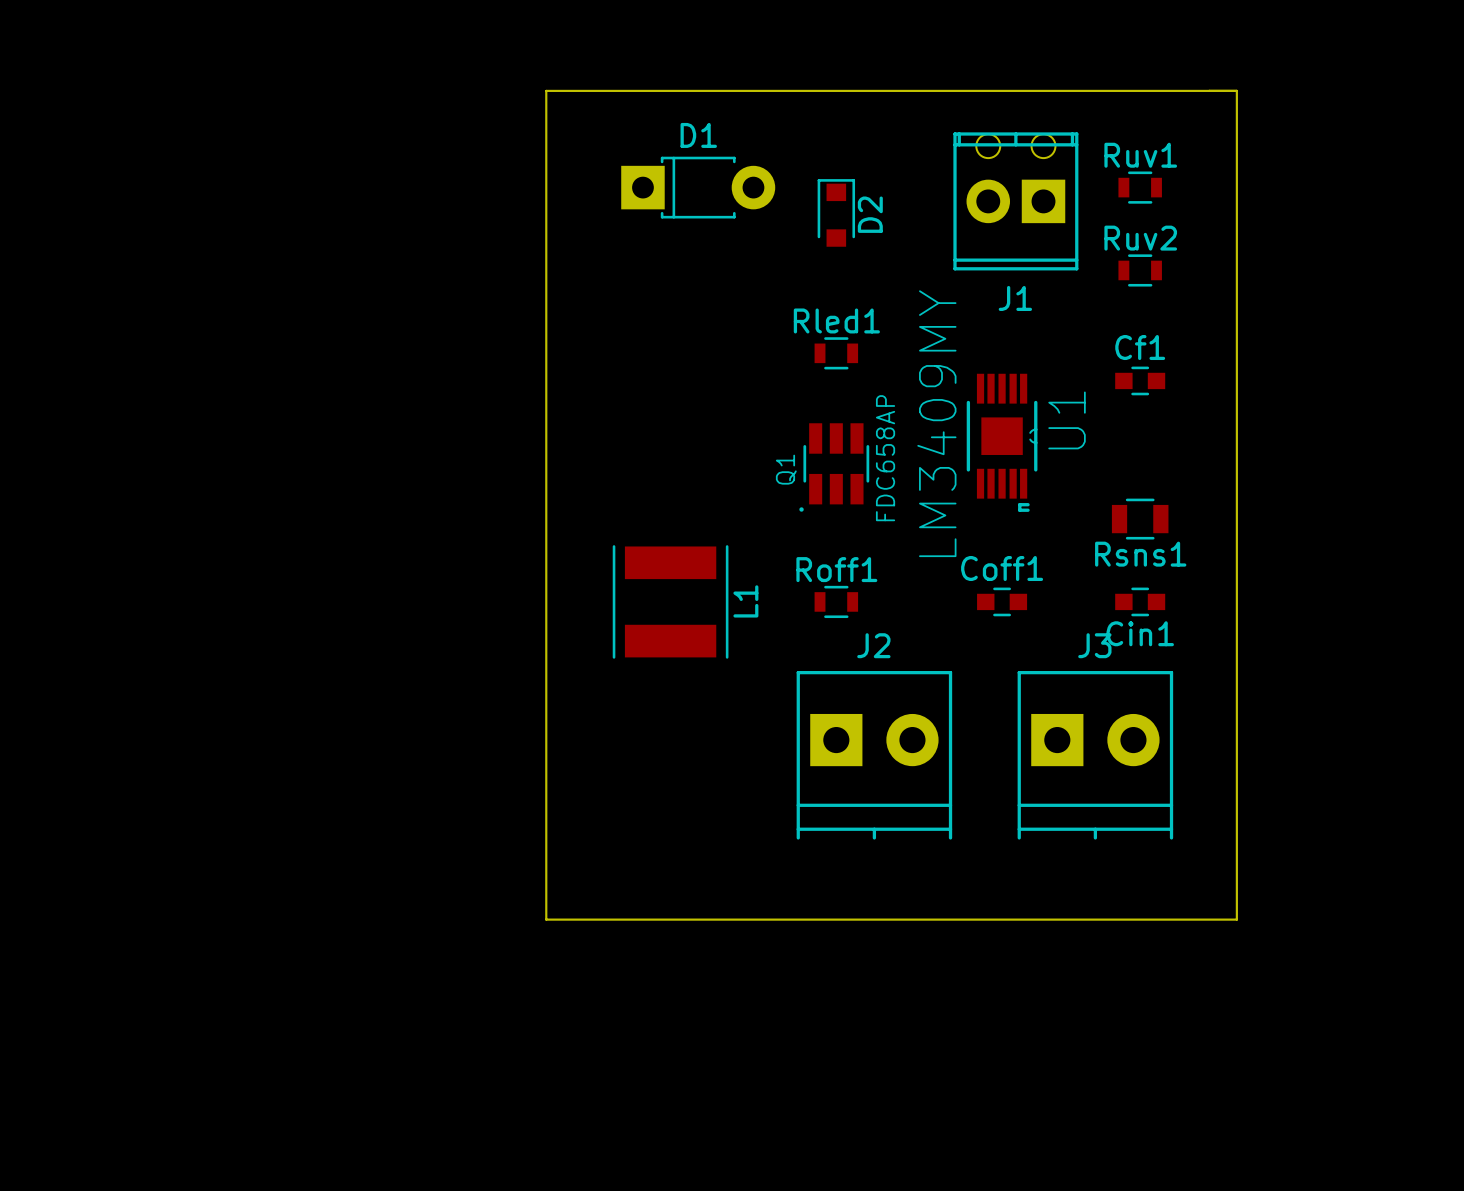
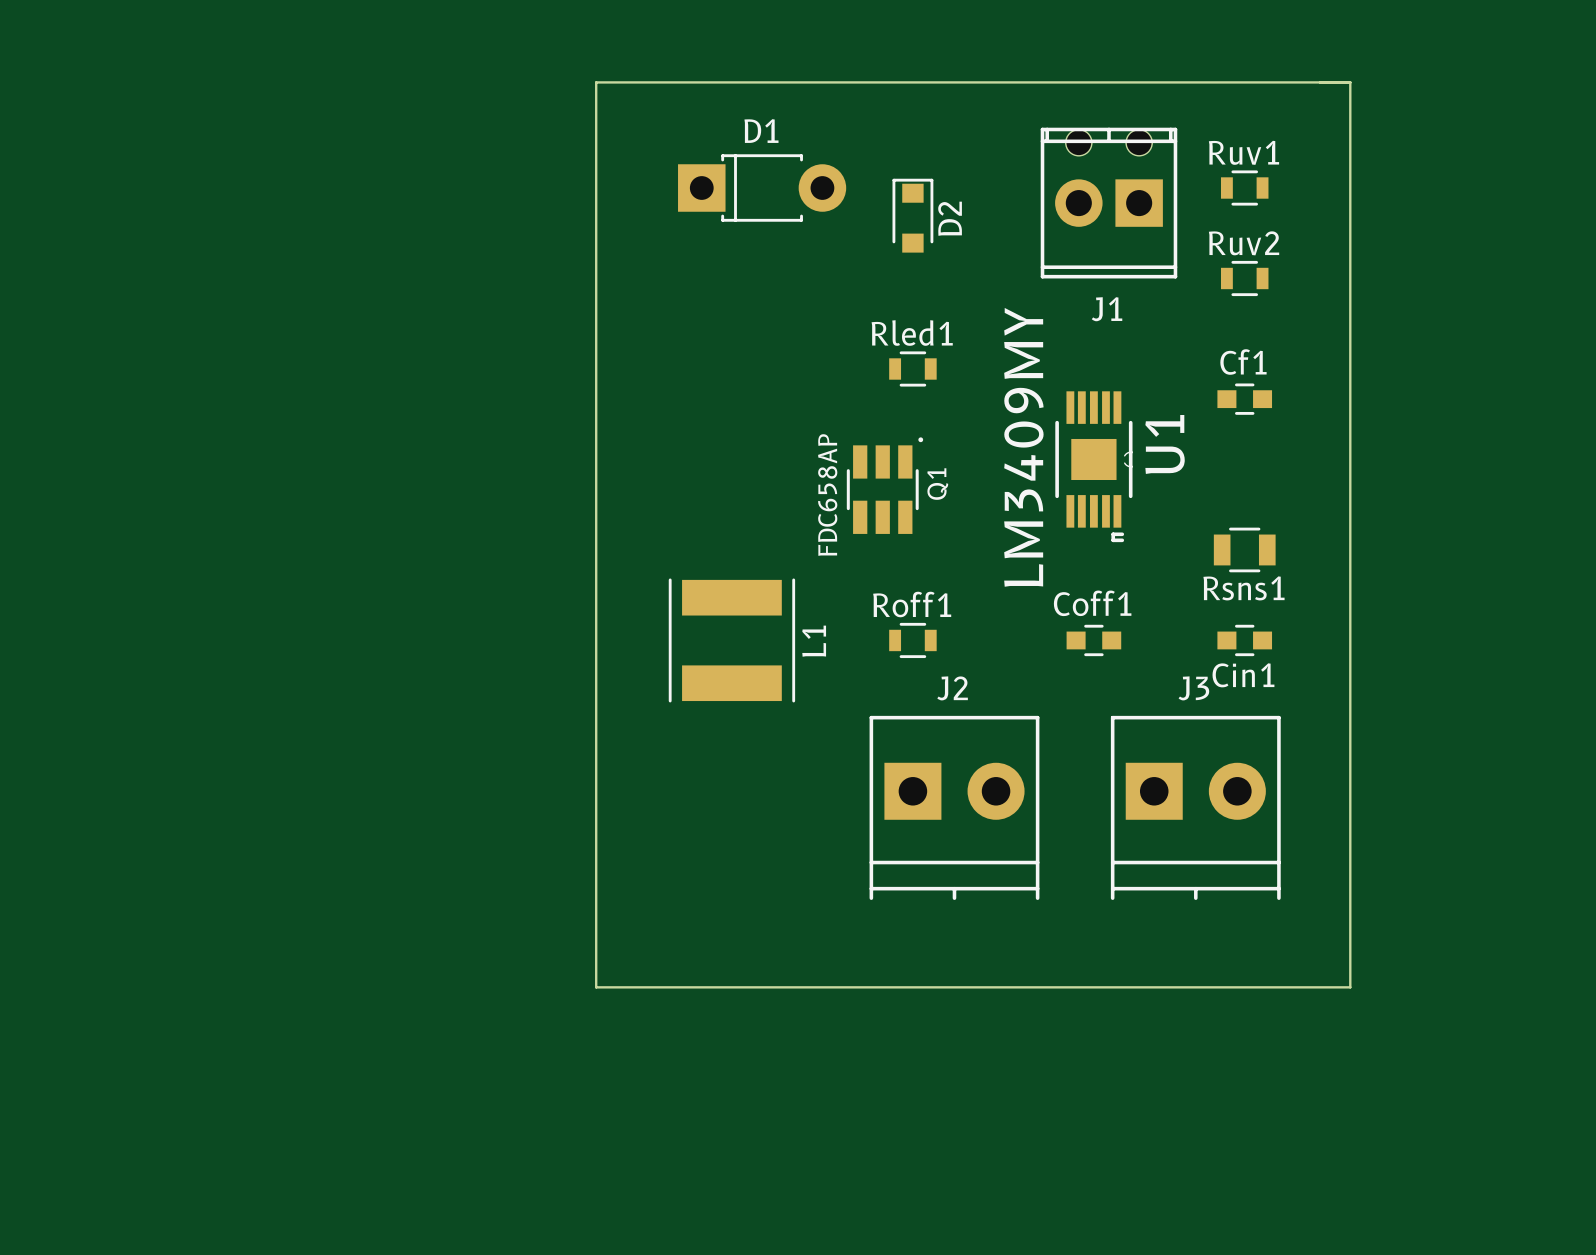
Q1 rotation: 0° (834, 467) -> 180° (884, 485)

